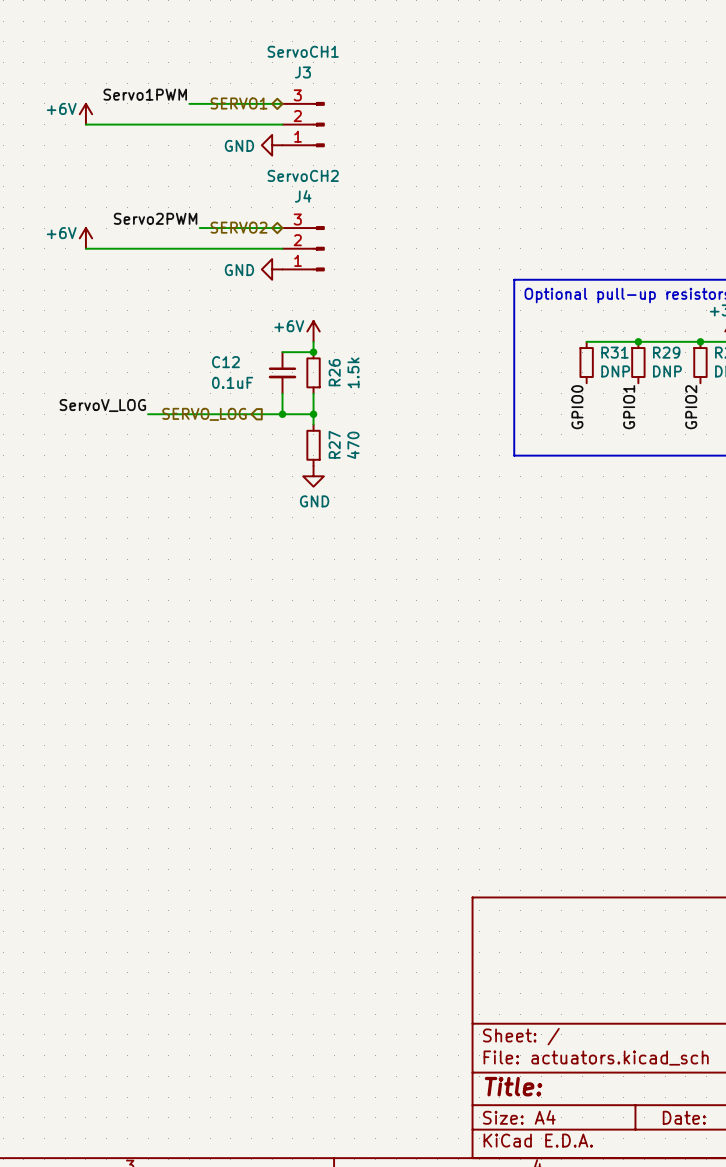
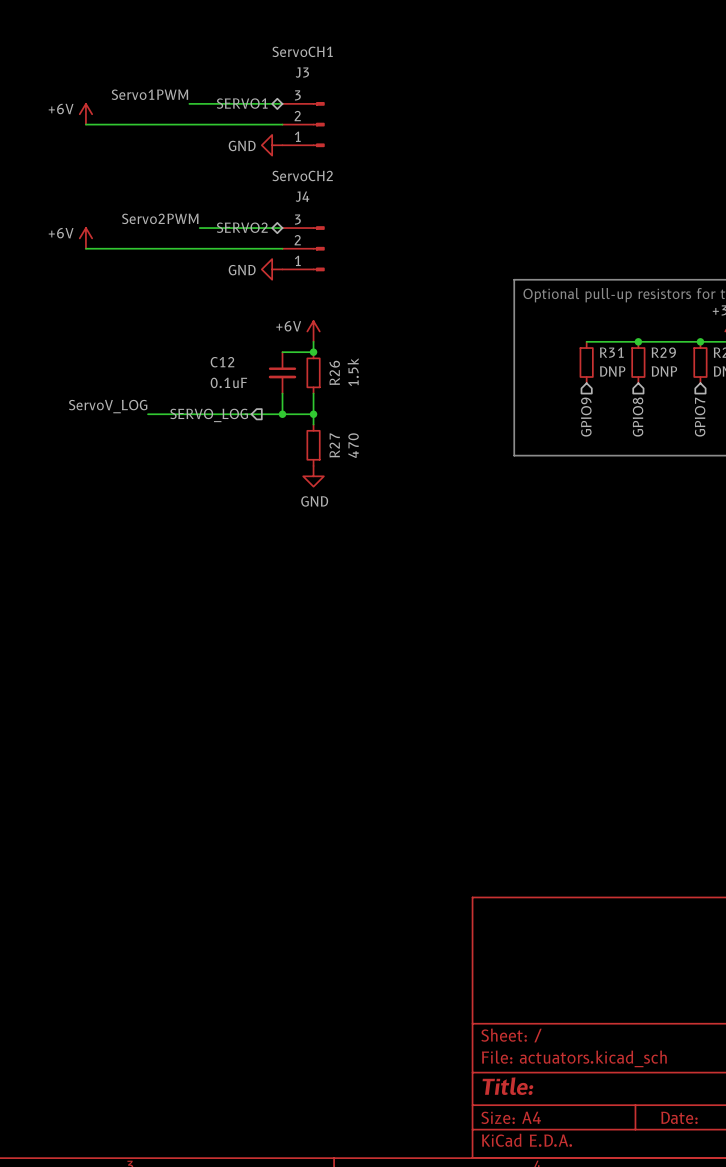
label: GPIO0 (577, 407) -> none
label: GPIO1 (629, 407) -> none
label: GPIO2 (691, 407) -> none
hierarchical label: none -> GPIO9 (586, 417)
hierarchical label: none -> GPIO8 (638, 417)
hierarchical label: none -> GPIO7 (700, 417)

